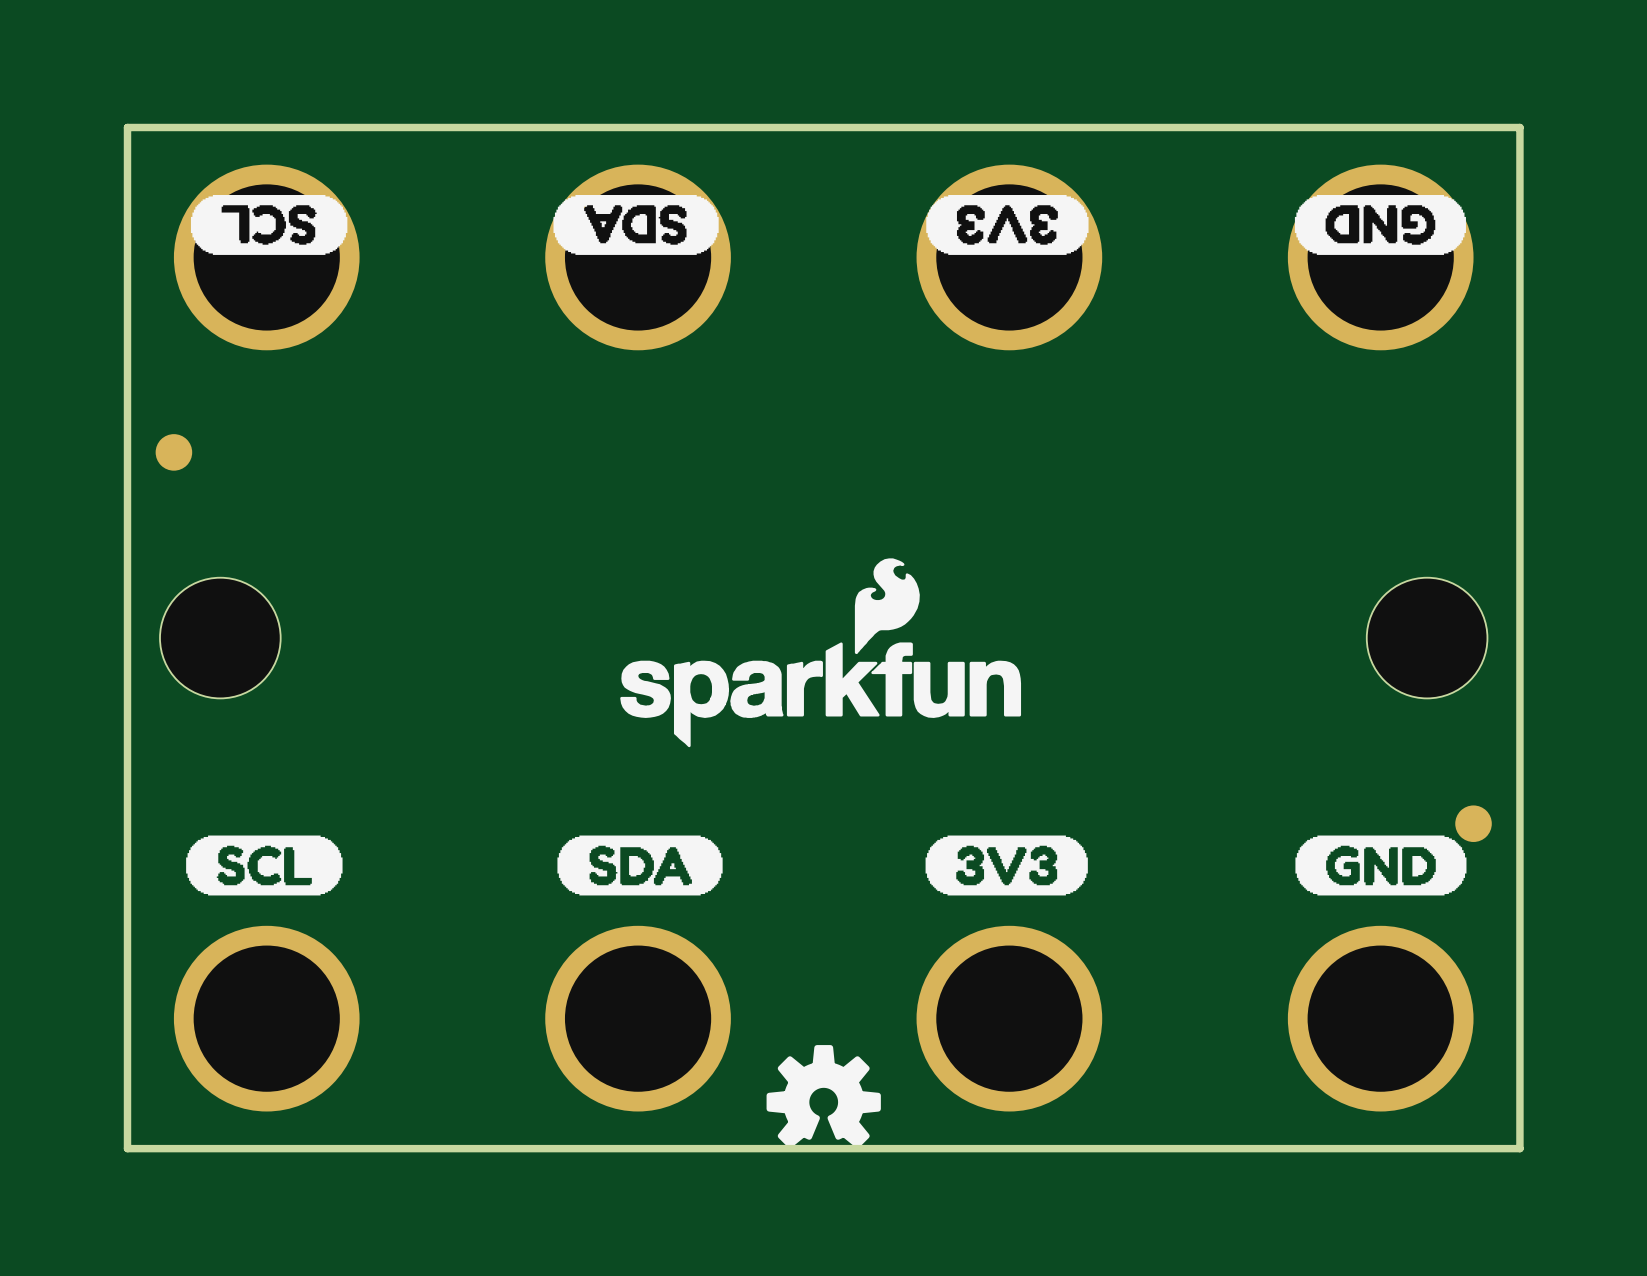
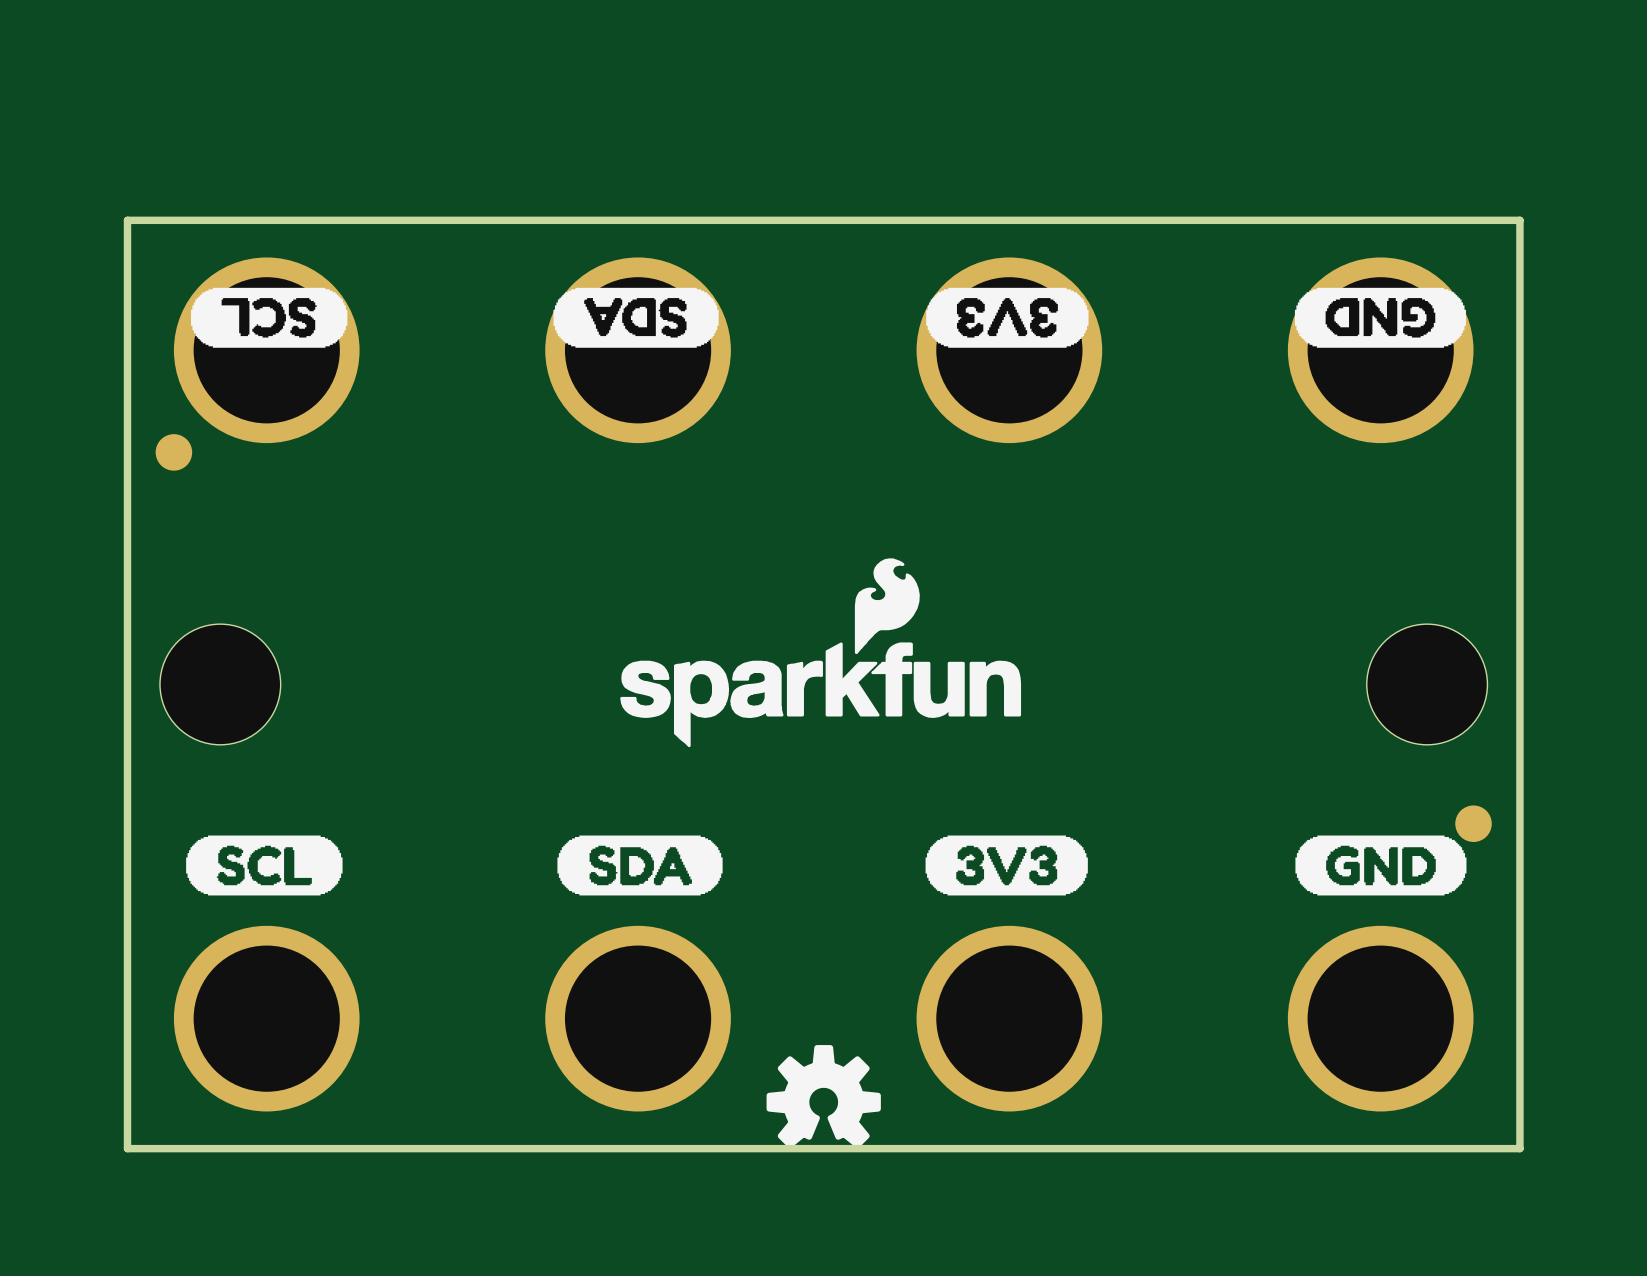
board edge: (1519, 220) (1519, 127) (127, 127) (127, 220) -> (1519, 220) (127, 220)
drawing position: (269, 224) -> (269, 317)
drawing position: (636, 224) -> (636, 317)
drawing position: (1007, 224) -> (1007, 317)
drawing position: (1380, 224) -> (1380, 317)
part position: (266, 257) -> (266, 350)
part position: (638, 257) -> (638, 350)
part position: (1009, 257) -> (1009, 350)
part position: (1380, 257) -> (1380, 350)
part position: (220, 638) -> (220, 684)
part position: (1427, 638) -> (1427, 684)

